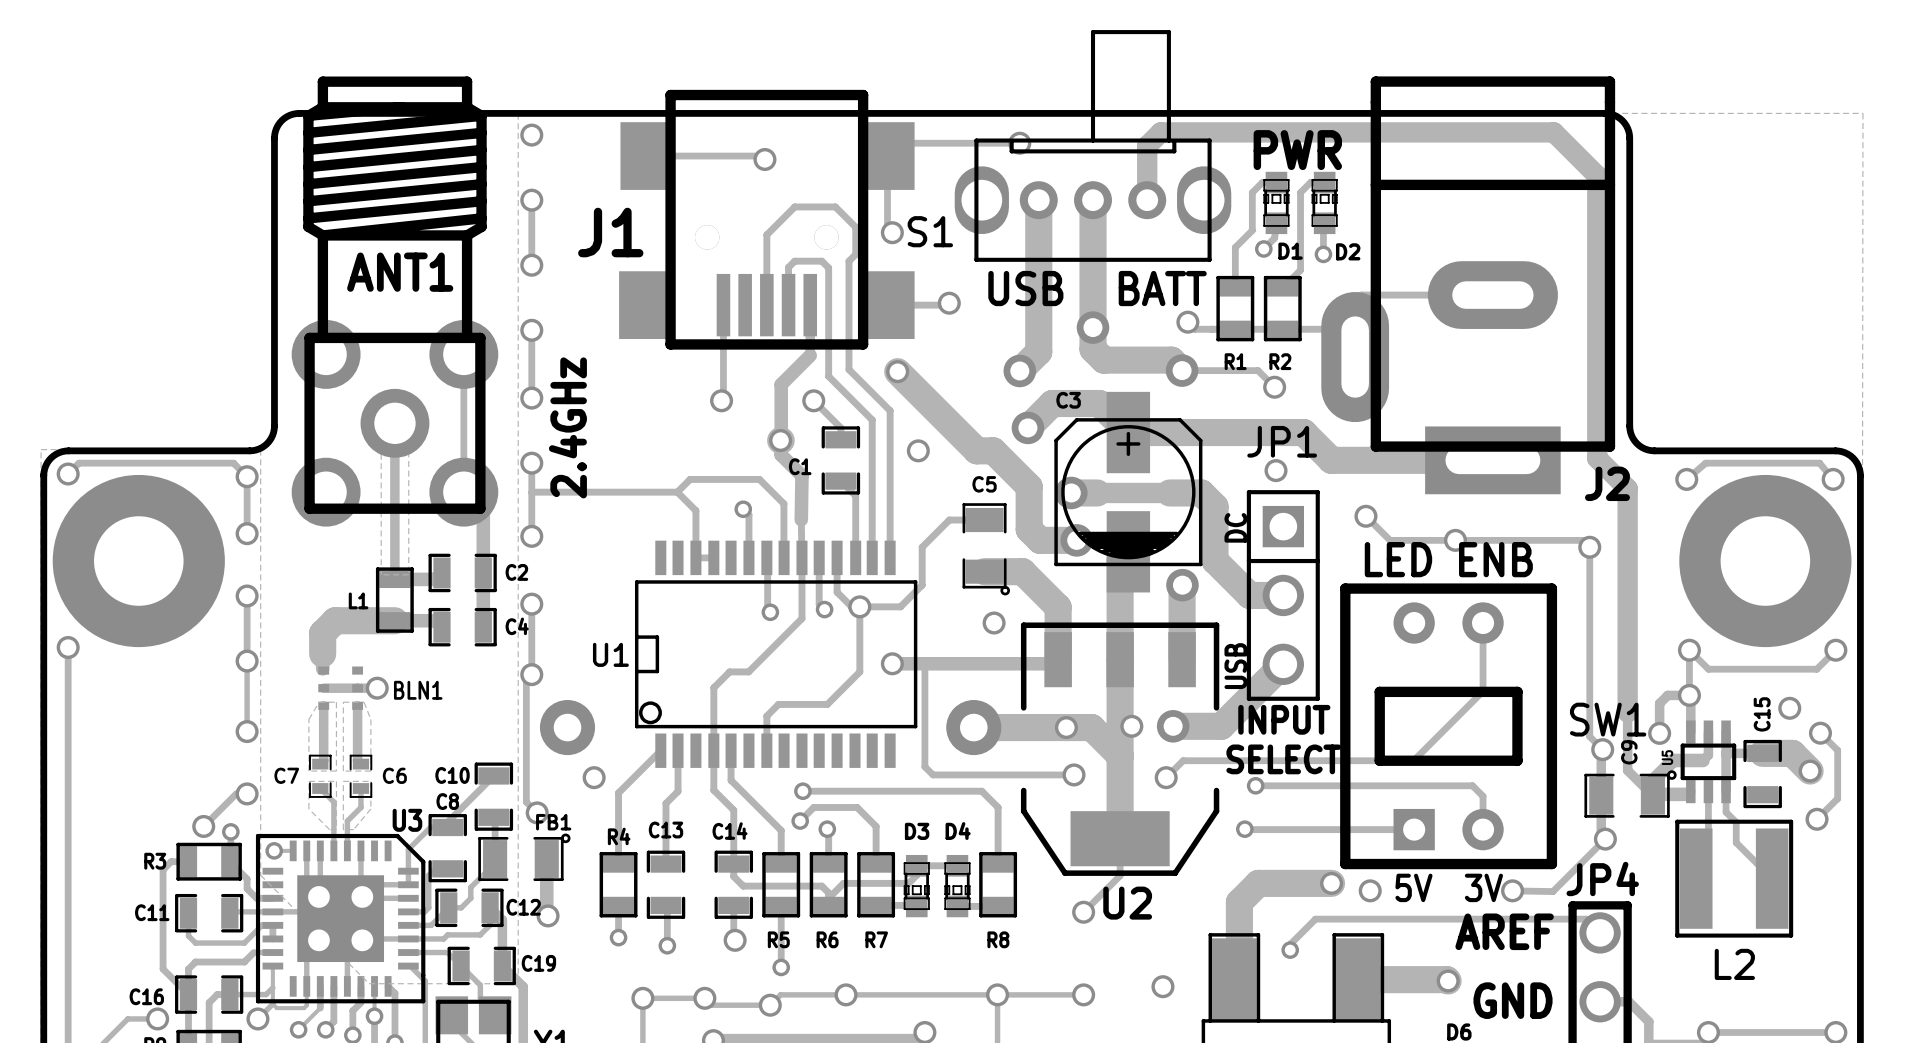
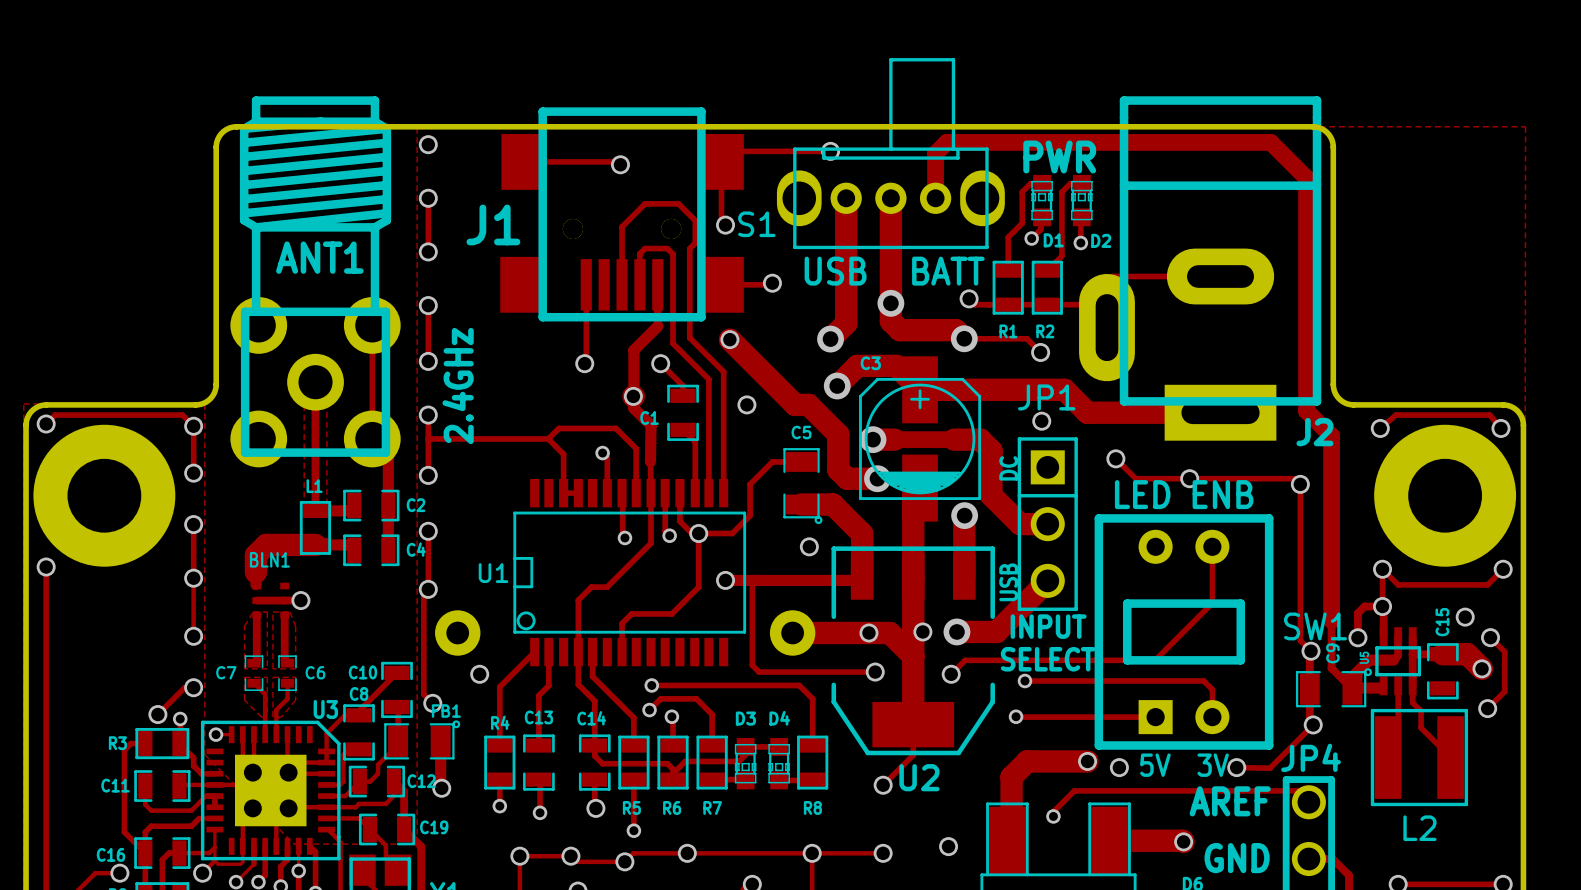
L1 name position: L1 (358, 600) -> L1 (314, 486)
BLN1 name position: BLN1 (418, 690) -> BLN1 (269, 559)

